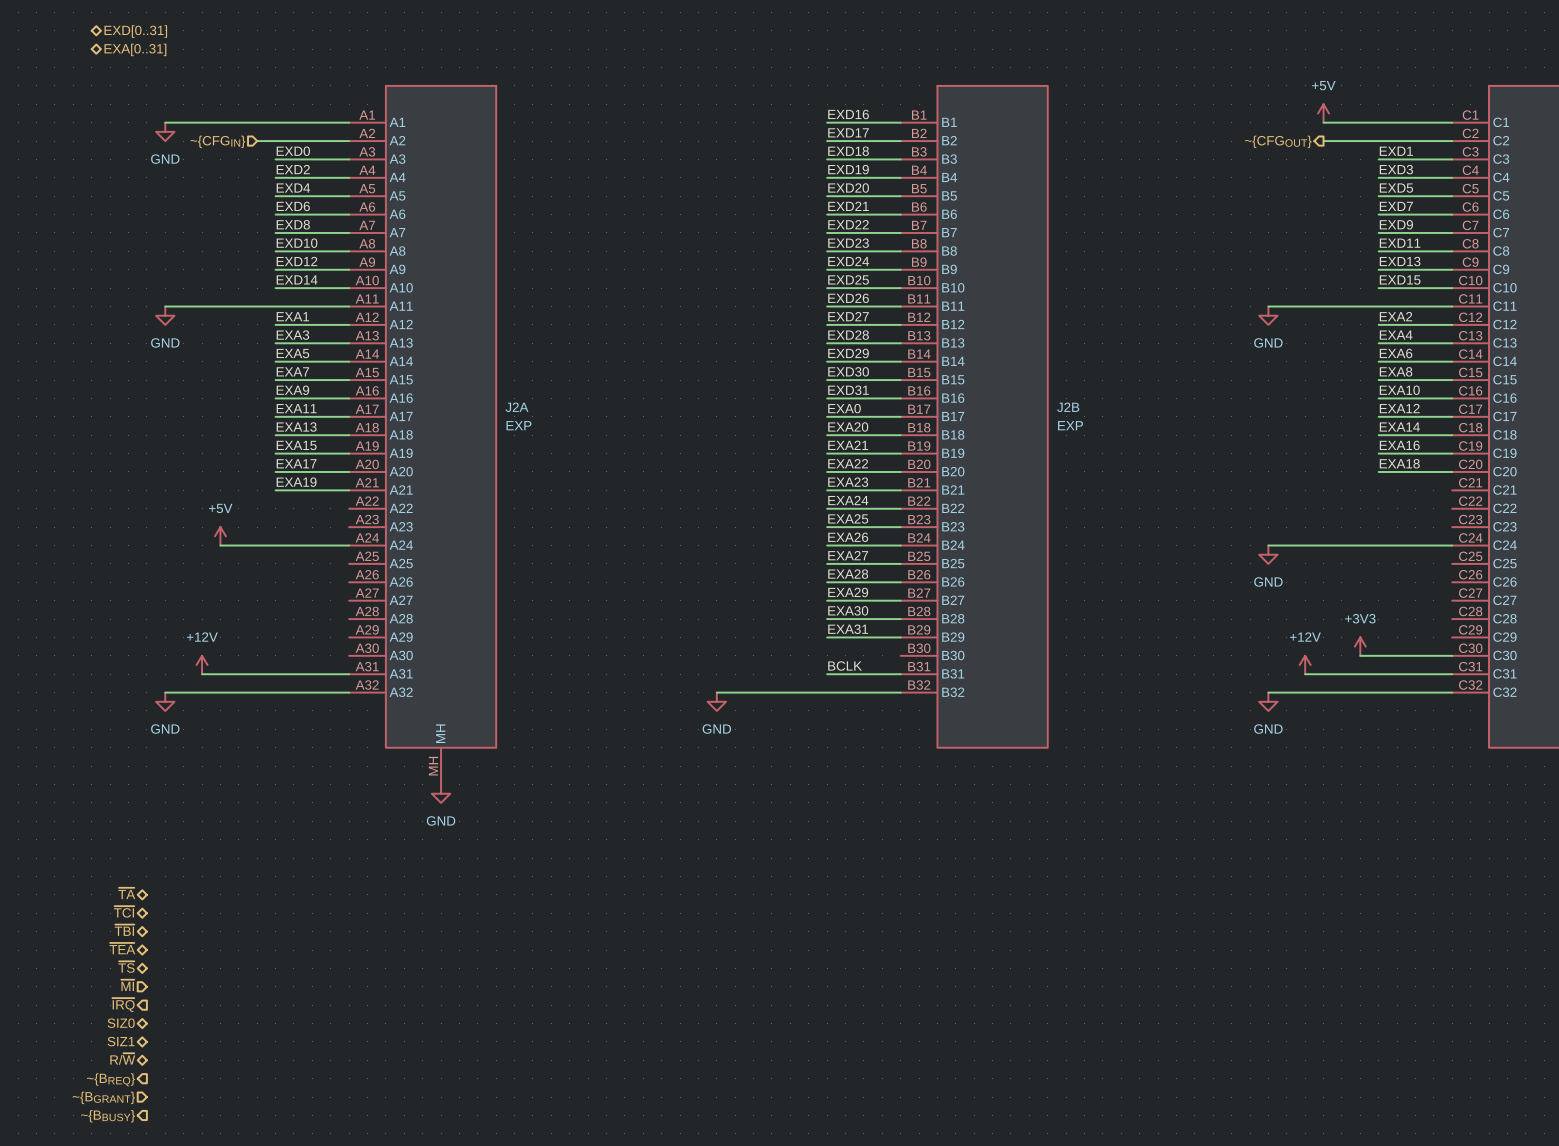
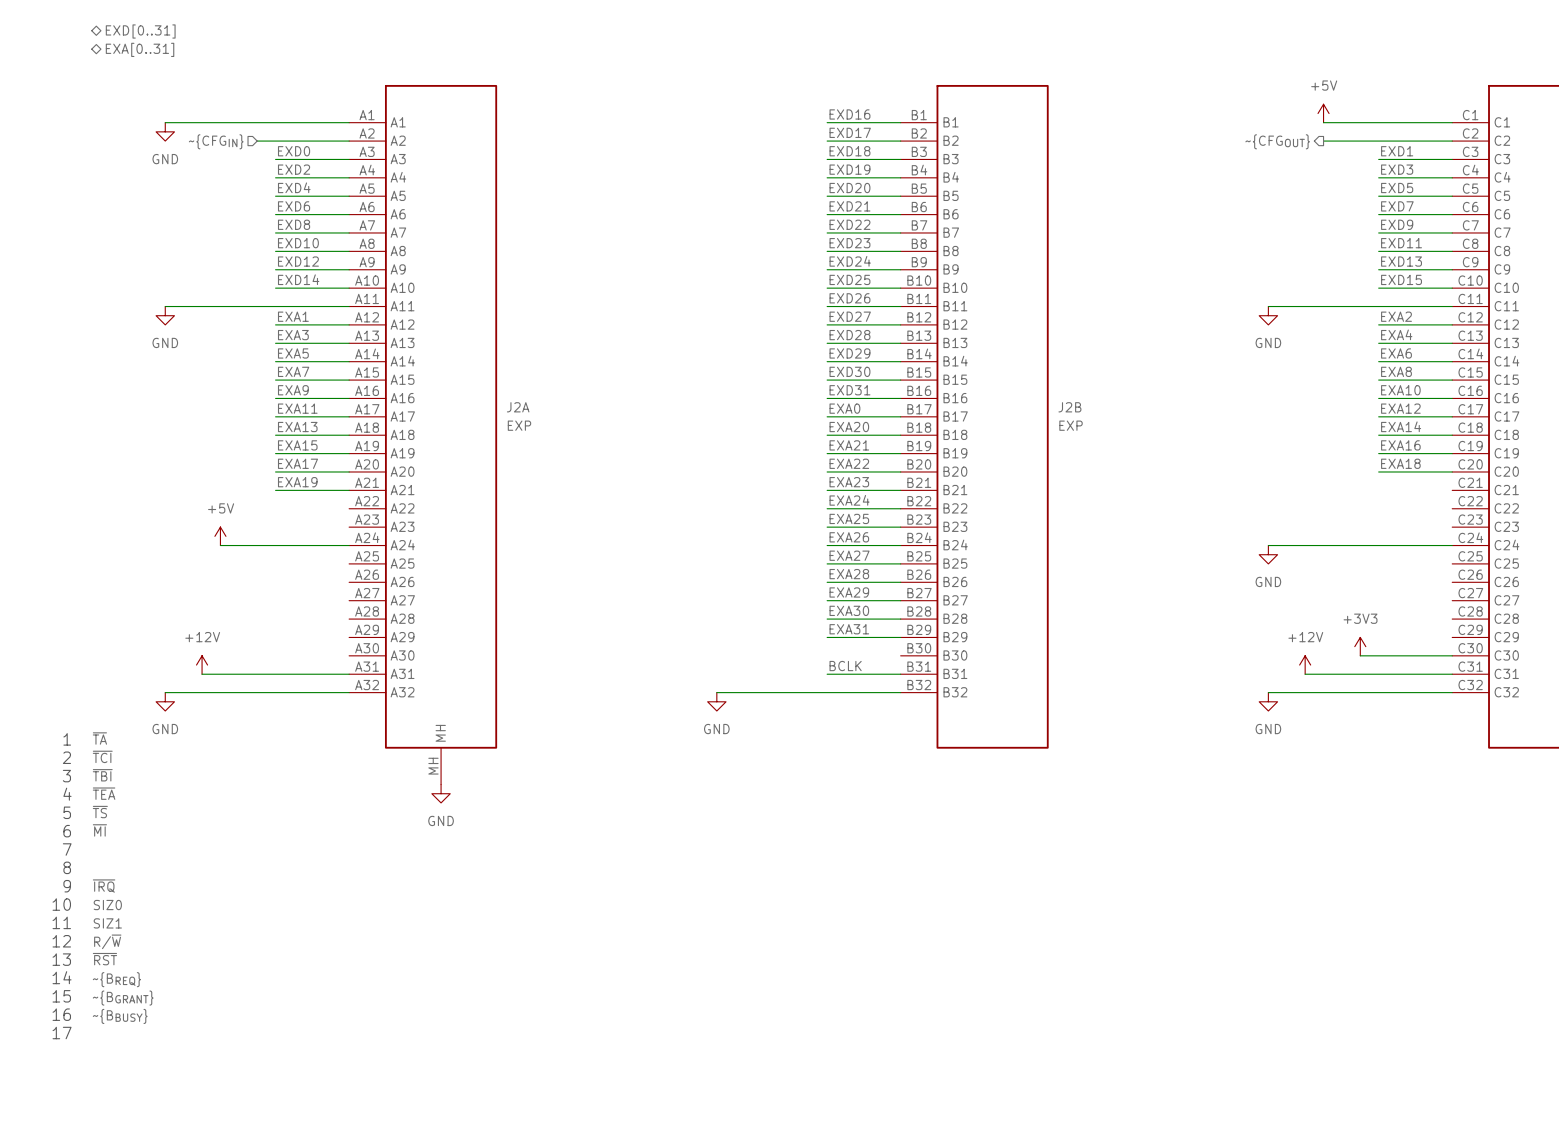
label: none -> ~{TA} (99, 738)
text: none -> 1 (67, 739)
label: none -> ~{TCI} (102, 756)
text: none -> 2 (66, 757)
label: none -> ~{TBI} (102, 775)
text: none -> 3 (66, 776)
label: none -> ~{TEA} (104, 793)
text: none -> 4 (67, 794)
text: none -> 5 (67, 812)
label: none -> ~{TS} (100, 812)
label: none -> ~{MI} (99, 830)
text: none -> 6 (67, 831)
text: none -> 7 (67, 849)
text: none -> 8 (67, 867)
text: none -> 9 (67, 886)
label: none -> ~{IRQ} (104, 886)
hierarchical label: ~{TA} (126, 893) -> none
text: none -> 10 (61, 904)
label: none -> SIZ0 (107, 905)
hierarchical label: ~{TCI} (124, 911) -> none
text: none -> 11 (61, 922)
label: none -> SIZ1 (107, 923)
hierarchical label: ~{TBI} (124, 930) -> none
label: none -> R/~{W} (107, 941)
text: none -> 12 (61, 941)
hierarchical label: ~{TEA} (122, 948) -> none
text: none -> 13 (61, 959)
label: none -> ~{RST} (104, 959)
hierarchical label: ~{TS} (126, 967) -> none
text: none -> 14 (62, 977)
label: none -> ~{BREQ} (116, 979)
hierarchical label: ~{MI} (127, 985) -> none
text: none -> 15 (61, 996)
label: none -> ~{BGRANT} (123, 998)
hierarchical label: ~{IRQ} (123, 1005) -> none
text: none -> 16 (61, 1014)
label: none -> ~{BBUSY} (120, 1016)
hierarchical label: SIZ0 (121, 1023) -> none
text: none -> 17 (62, 1033)
hierarchical label: SIZ1 (121, 1041) -> none
hierarchical label: R/~{W} (122, 1058) -> none
hierarchical label: ~{BREQ} (111, 1079) -> none
hierarchical label: ~{BGRANT} (103, 1097) -> none
hierarchical label: ~{BBUSY} (108, 1116) -> none

